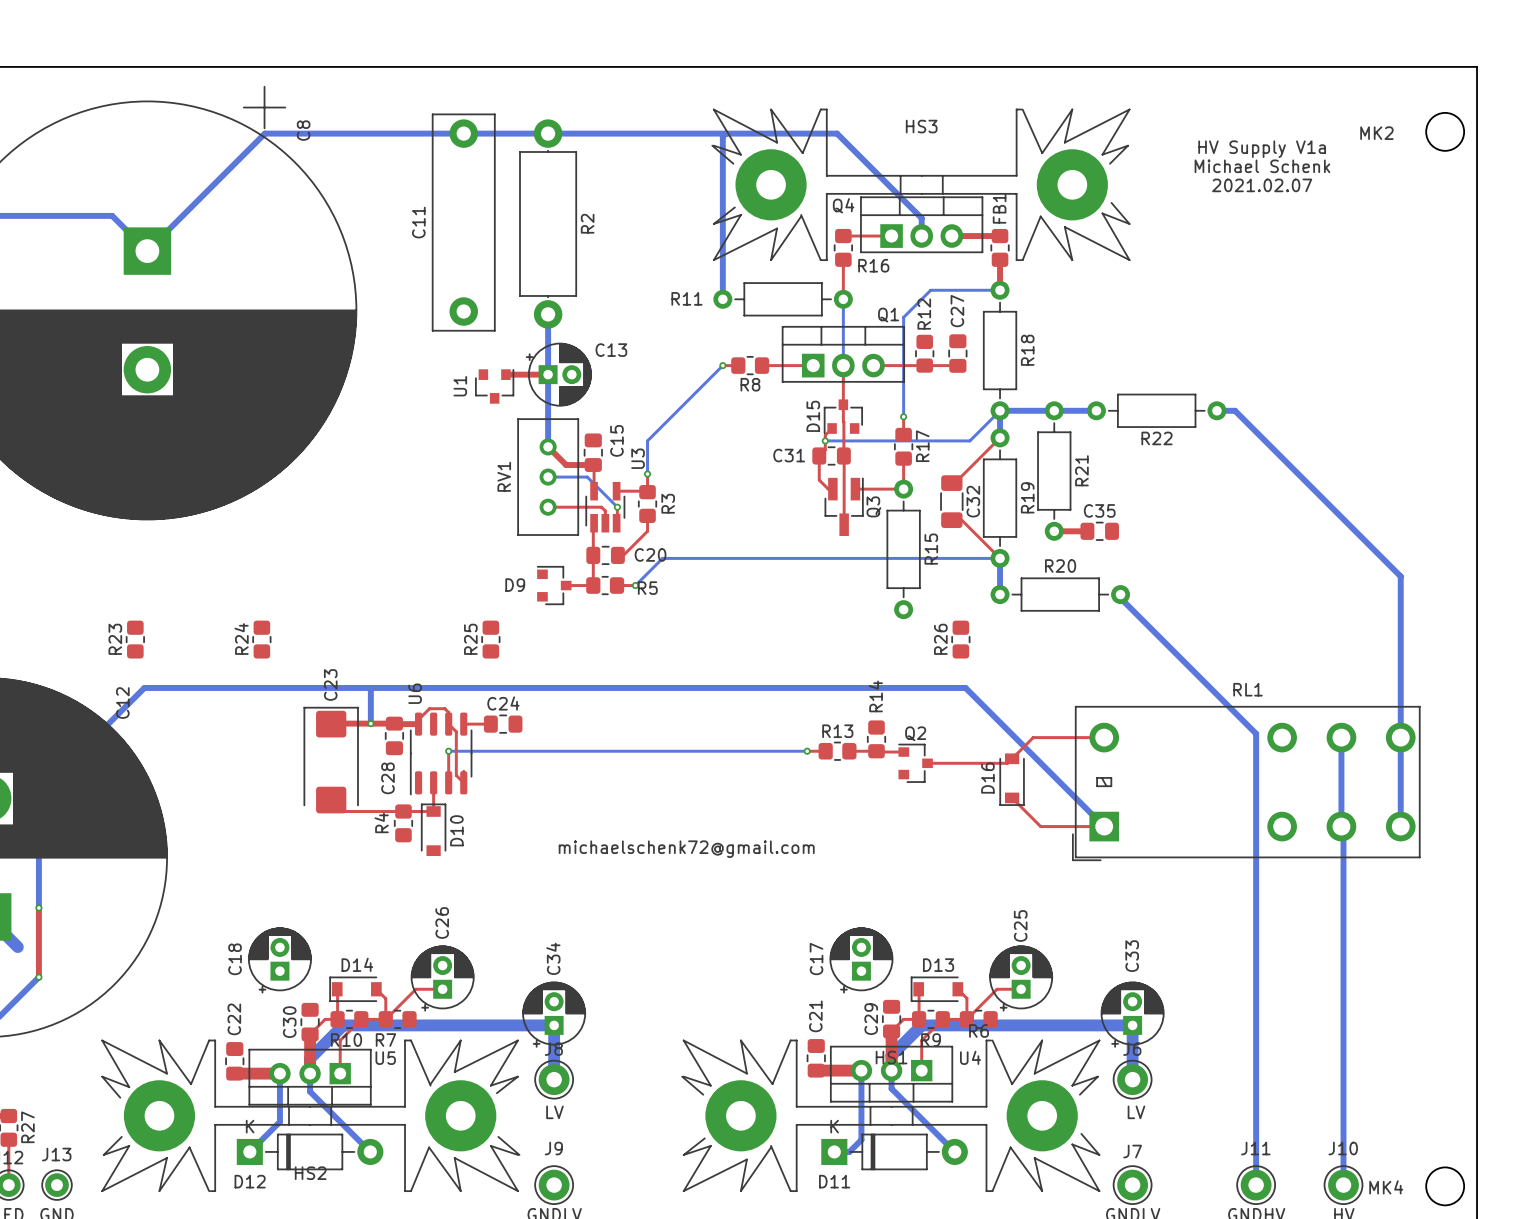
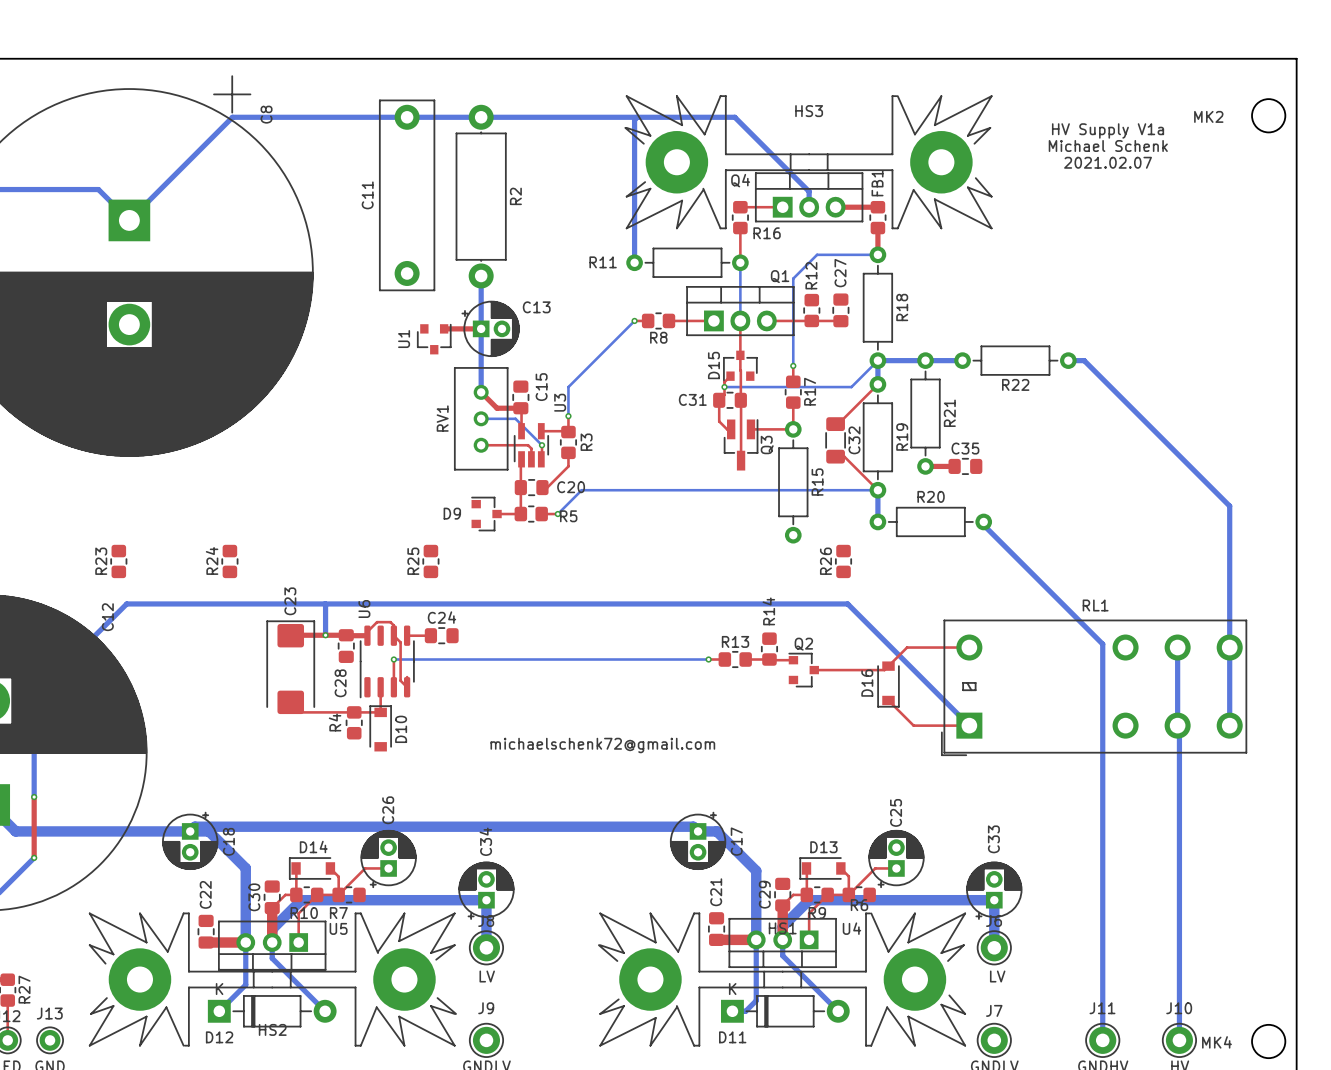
bottom track: none -> (15, 831) (208, 831) (245, 868) (245, 942)
bottom track: none -> (190, 831) (194, 826) (693, 826) (698, 831) (716, 831) (756, 870) (756, 939)
C18 rotation: 0° (279, 960) -> 180° (190, 840)
C18 position: (279, 960) -> (190, 840)
C17 rotation: 0° (861, 960) -> 180° (698, 840)
C17 position: (861, 960) -> (698, 840)

